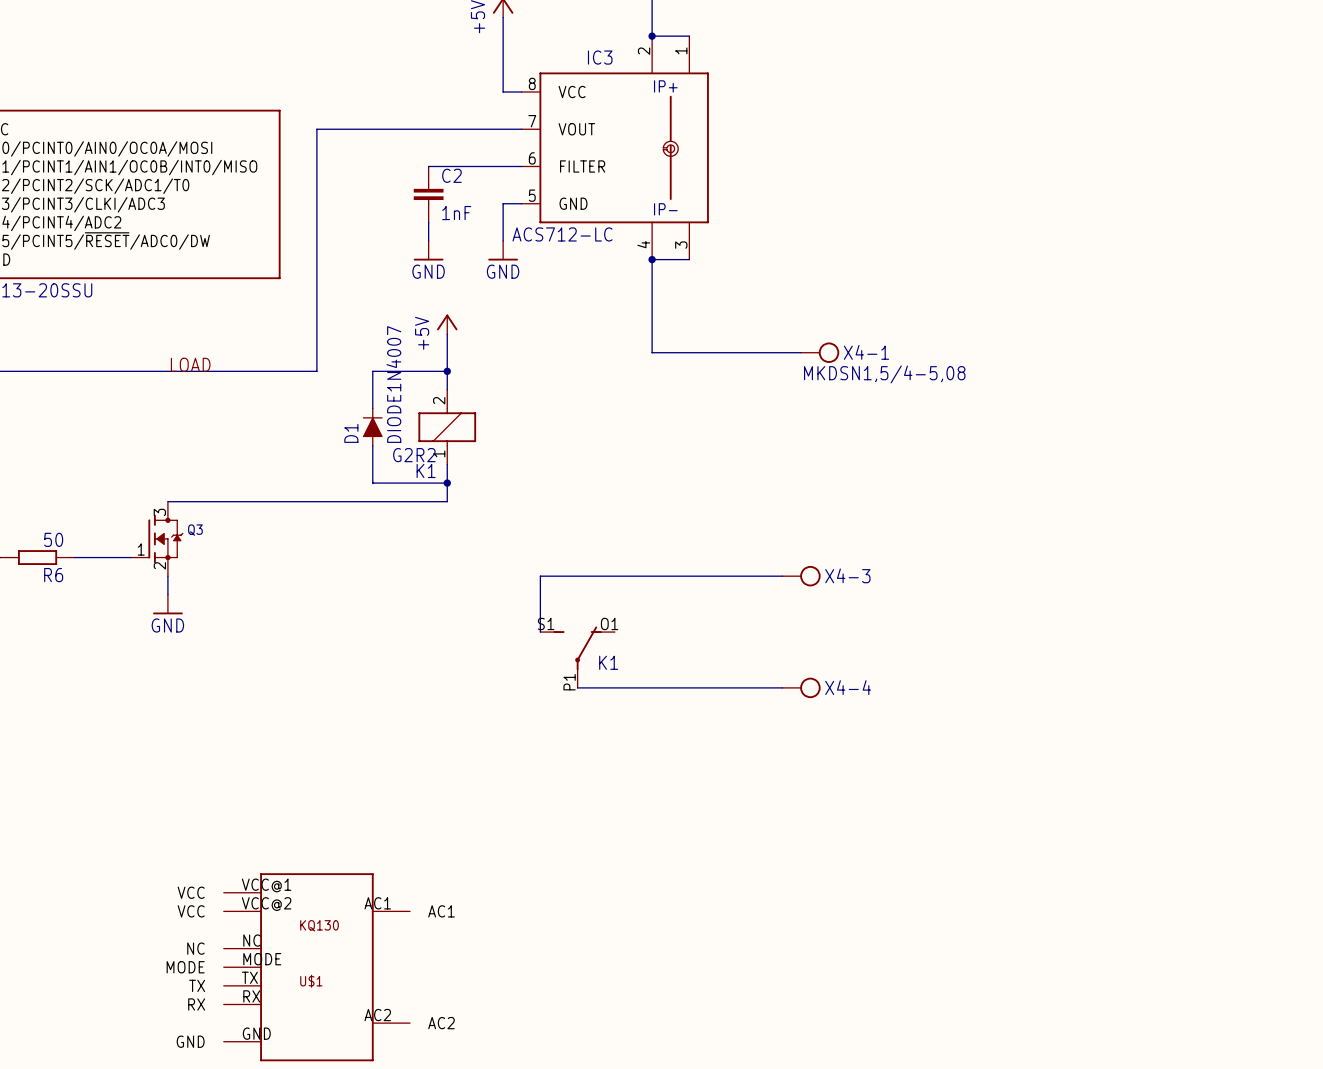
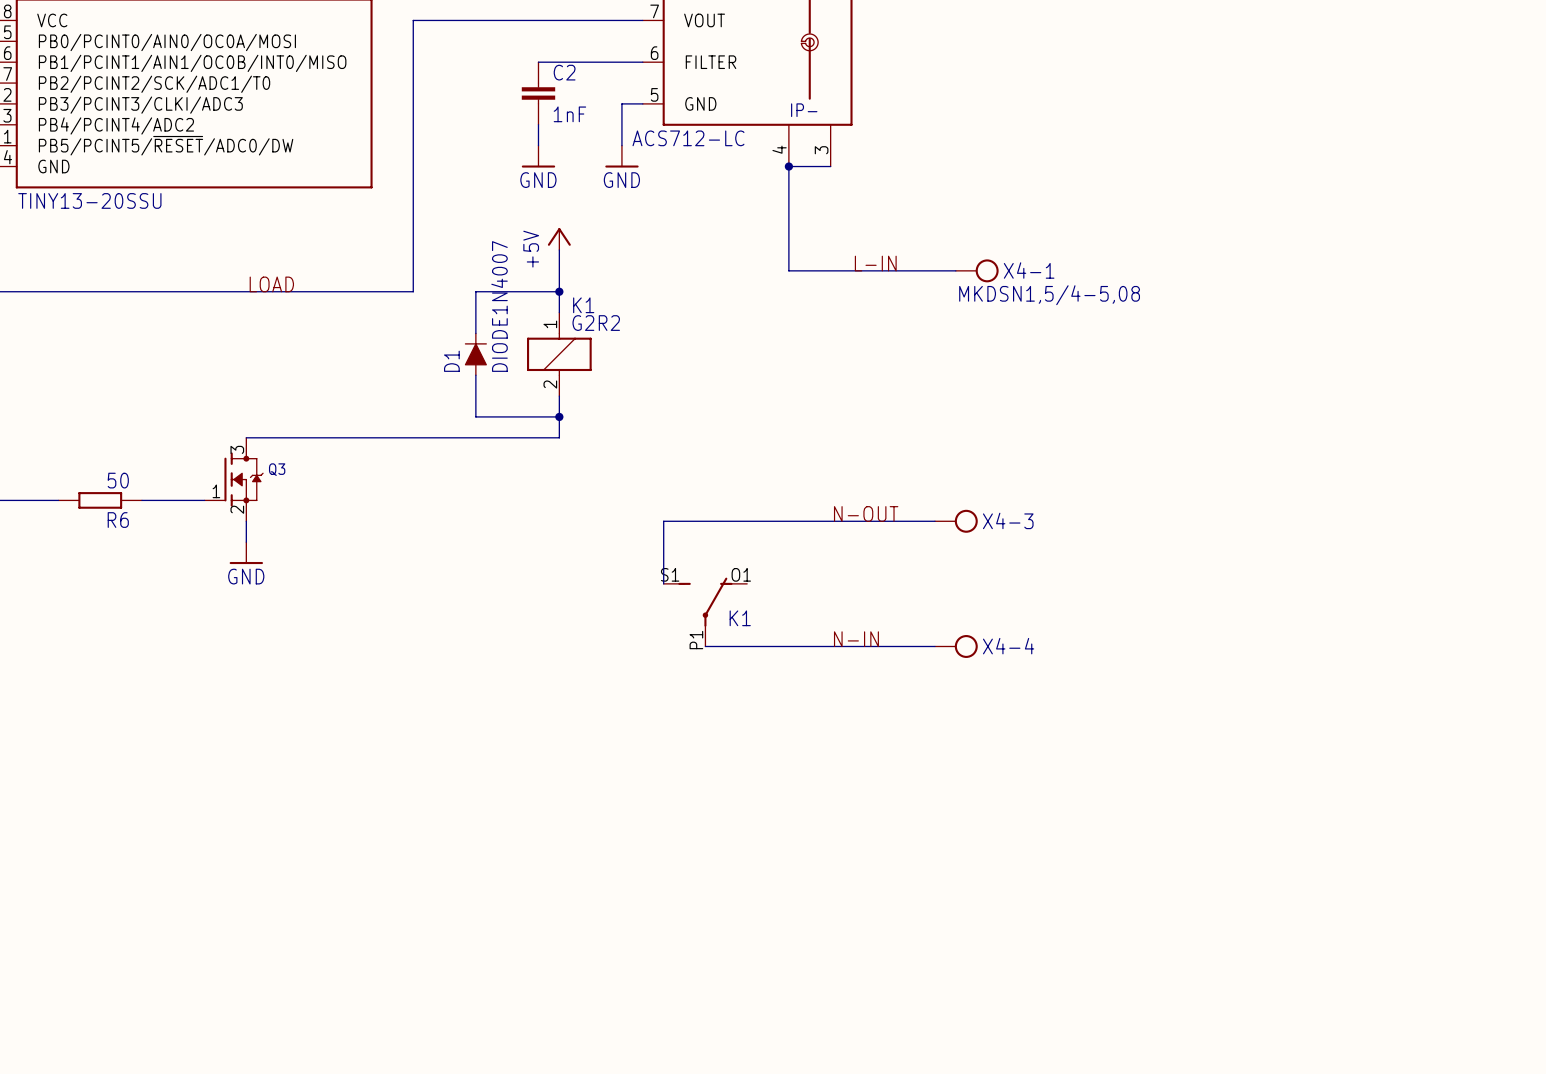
label: none -> L-IN (875, 263)
K1 rotation: 0° (447, 427) -> 180° (559, 354)
label: none -> N-OUT (866, 513)
label: none -> N-IN (856, 639)
U$1: KQ130 (316, 967) -> none

